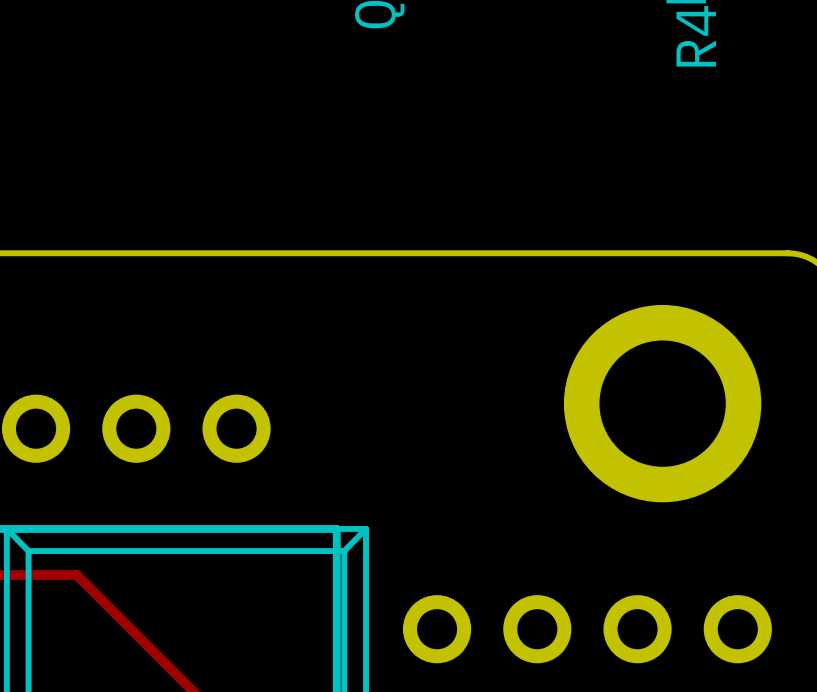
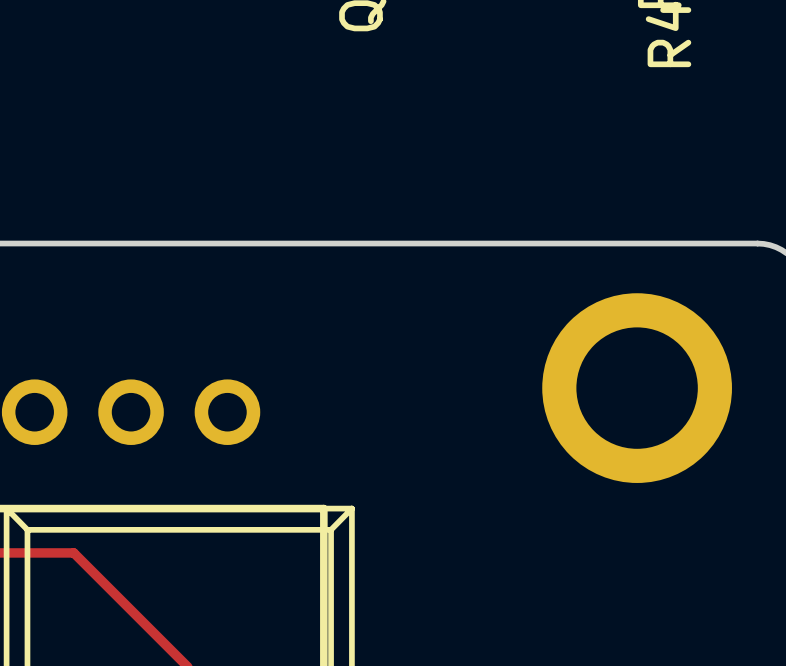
part: (437, 629) -> none
part: (537, 629) -> none
part: (637, 629) -> none
part: (737, 629) -> none

